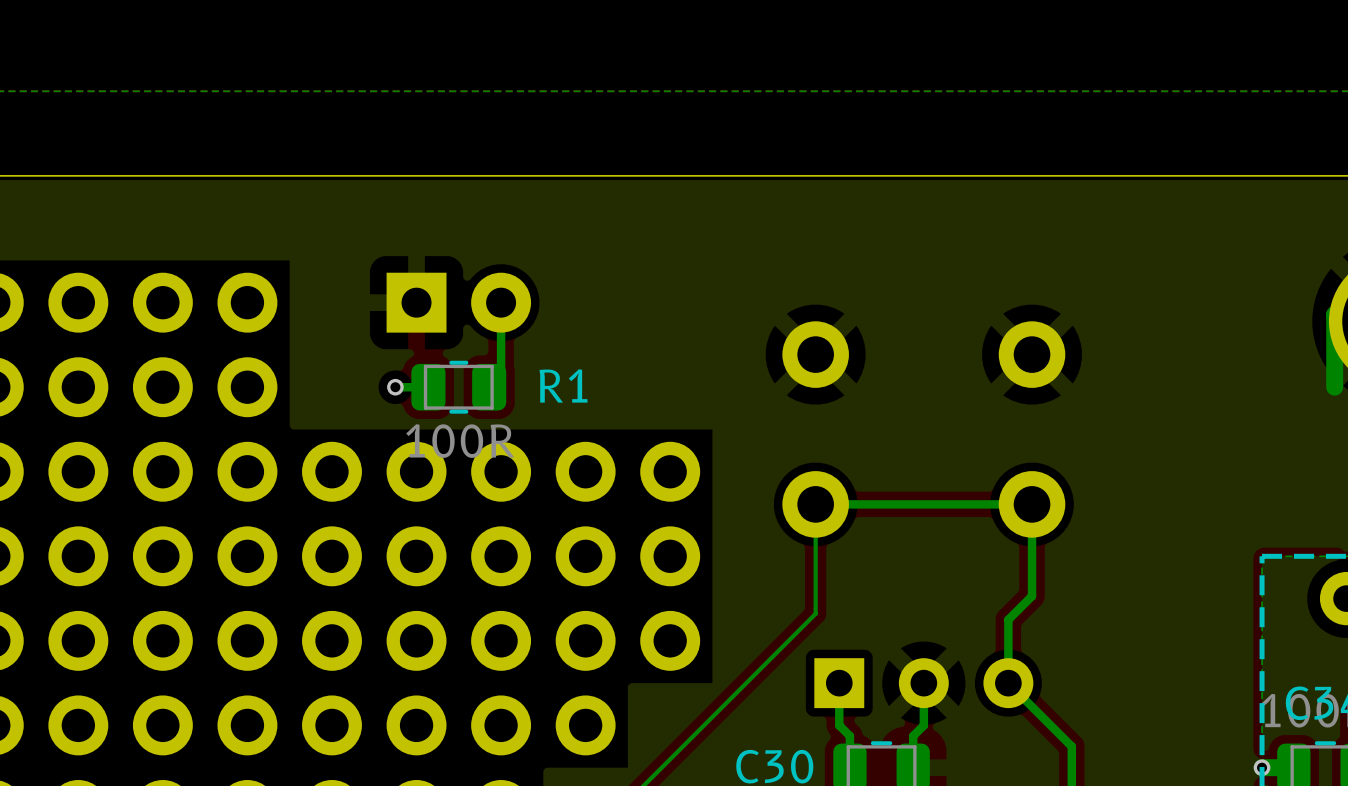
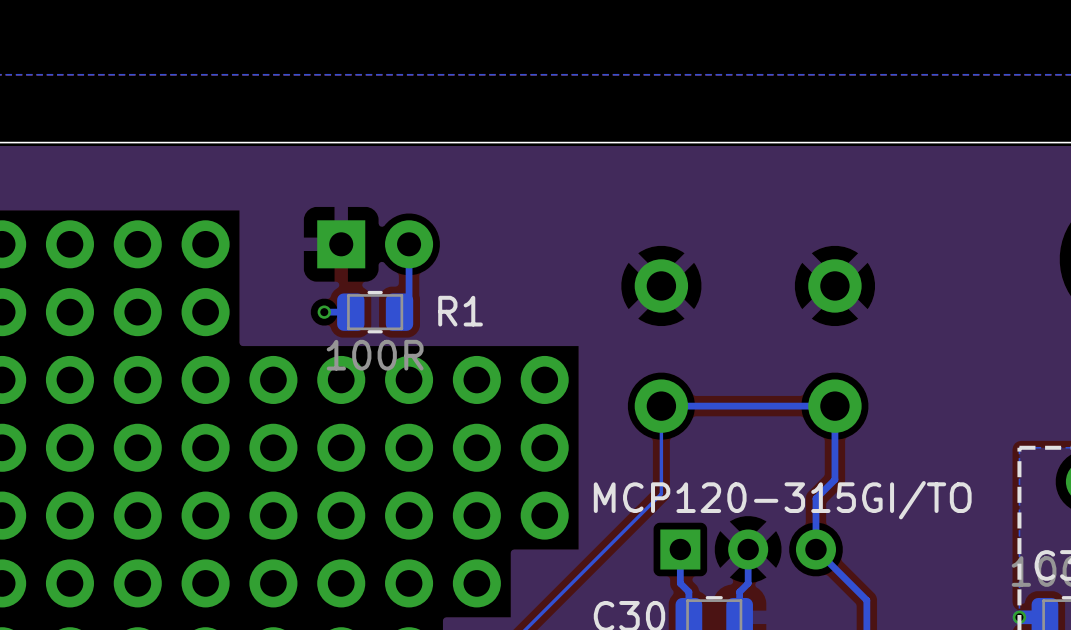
part value: none -> MCP120-315GI/TO (782, 500)

